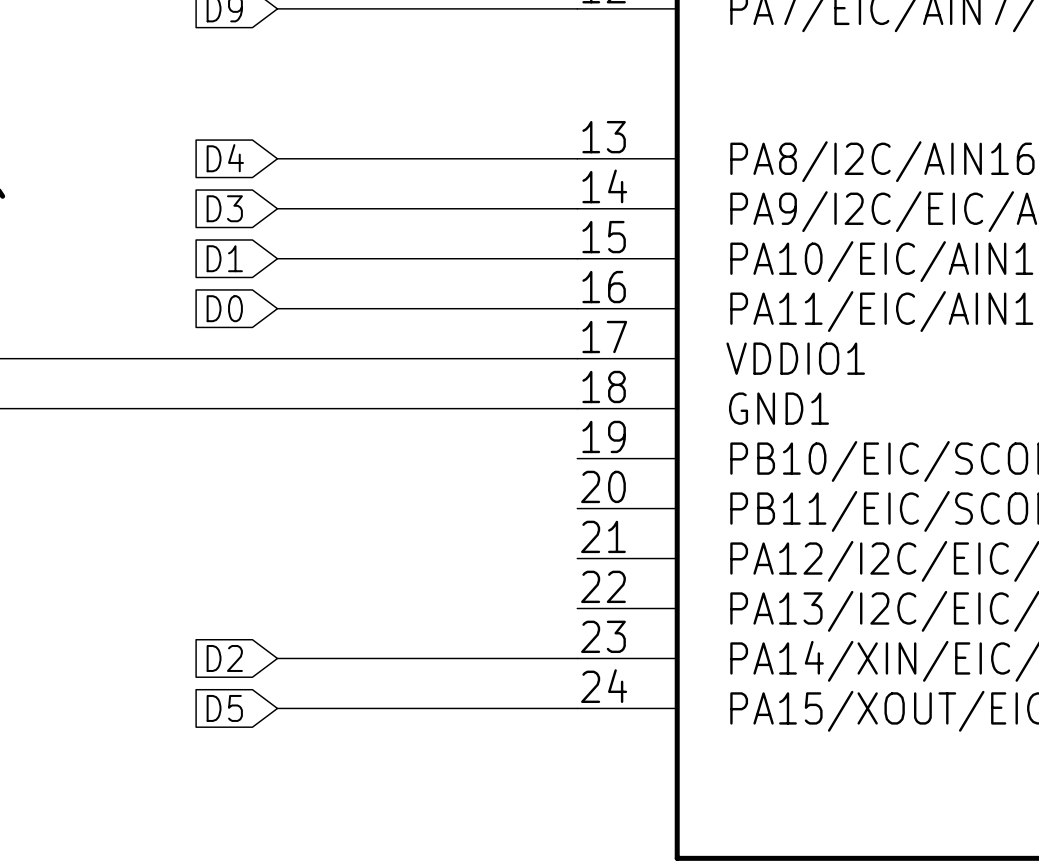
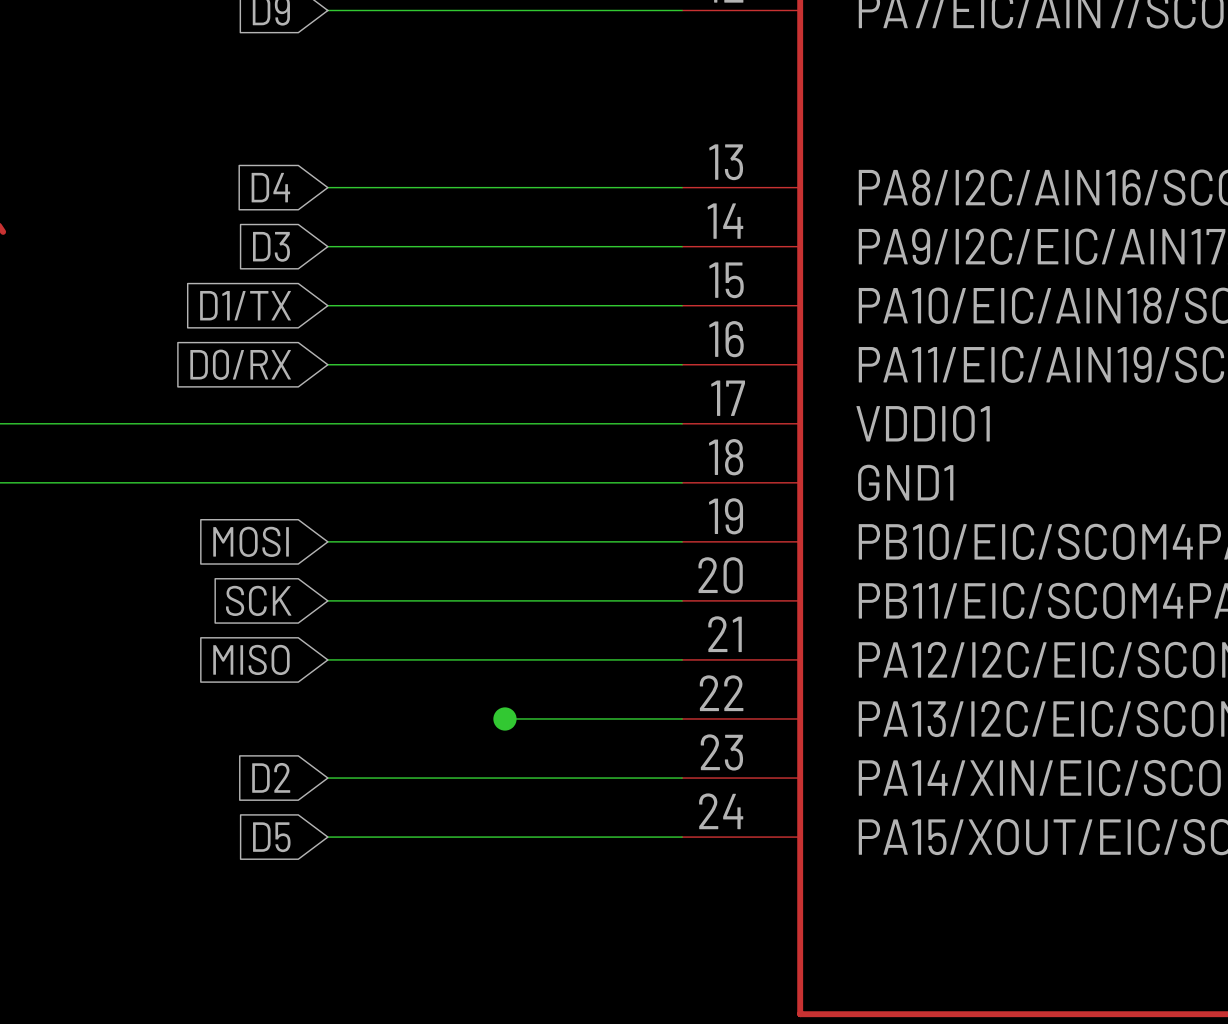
global label: D1 (224, 258) -> D1/TX (245, 305)
global label: D0 (224, 308) -> D0/RX (240, 364)
global label: none -> MOSI (251, 541)
wire: none -> (327, 541) (682, 541)
global label: none -> SCK (258, 600)
wire: none -> (327, 600) (682, 600)
global label: none -> MISO (251, 659)
wire: none -> (327, 659) (682, 659)
wire: none -> (504, 718) (682, 718)
junction: none -> (504, 718)

